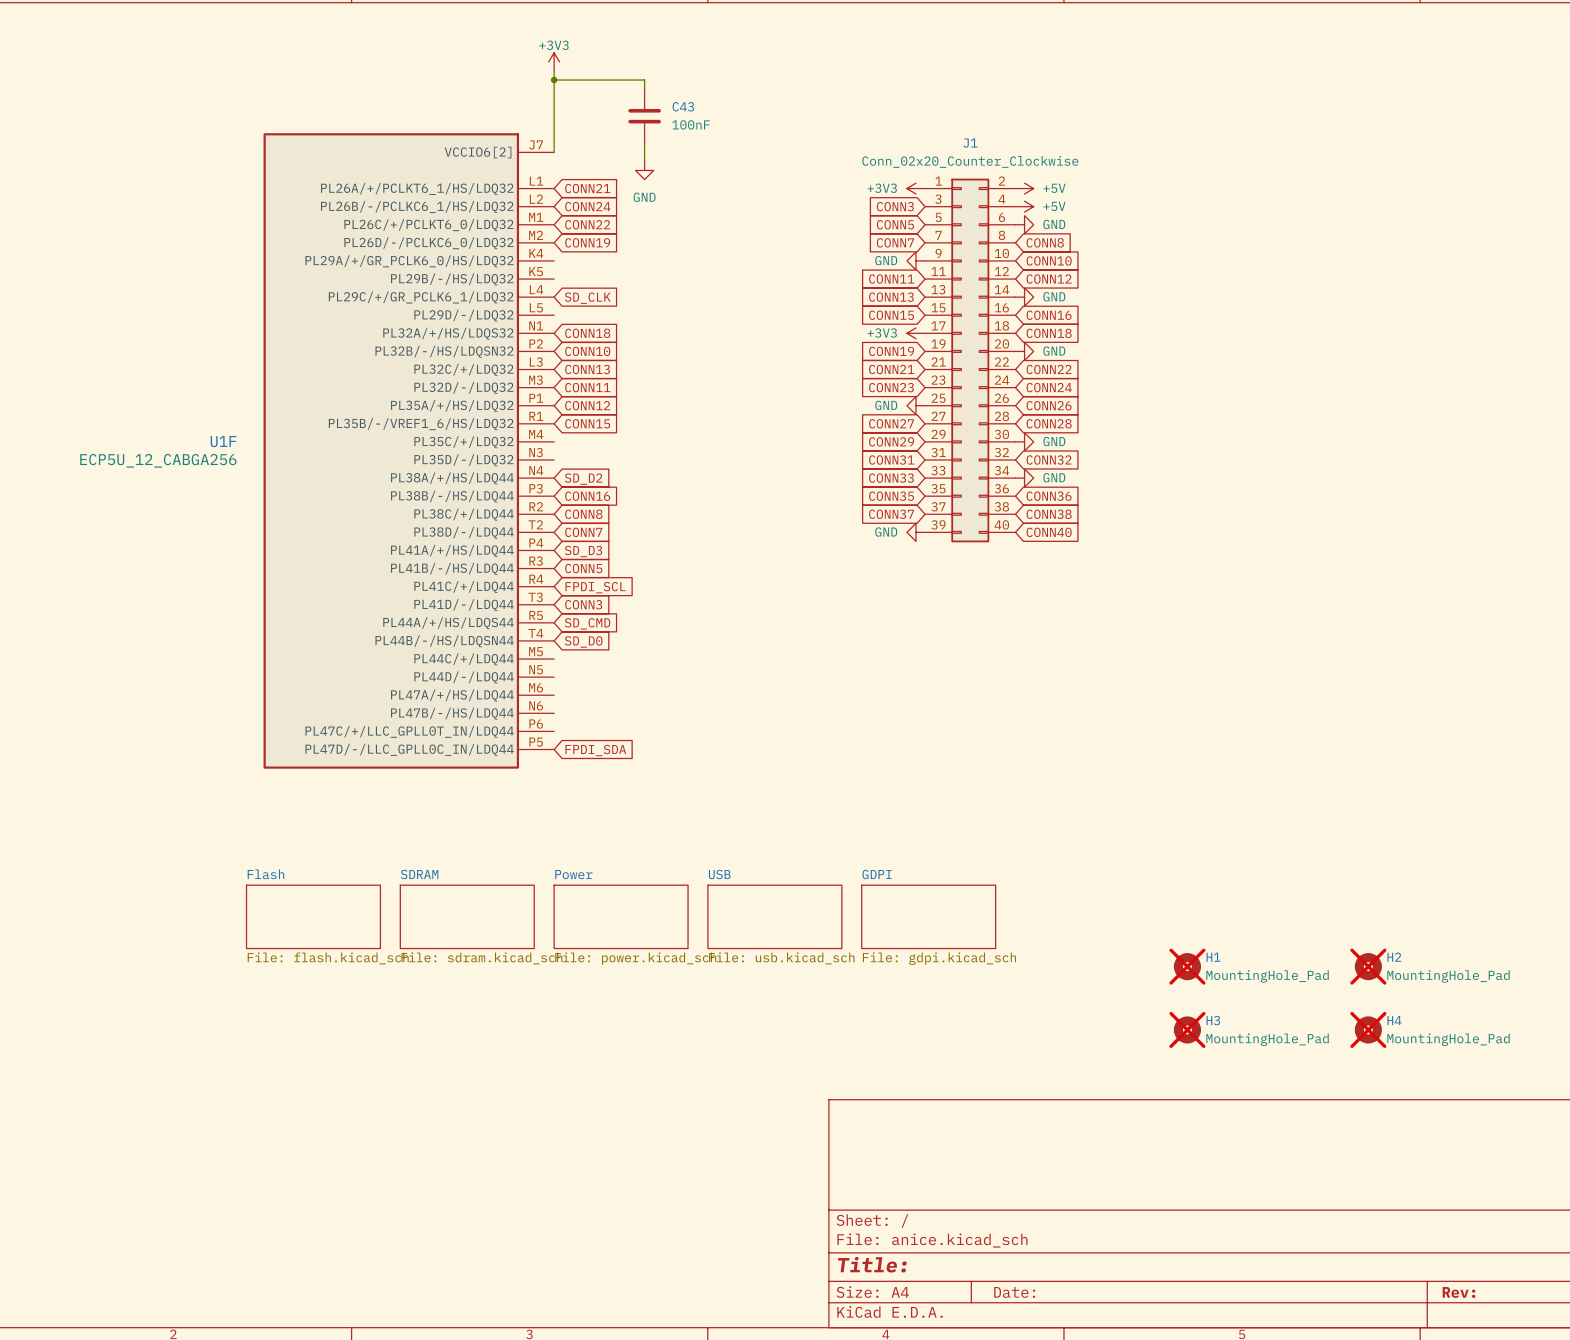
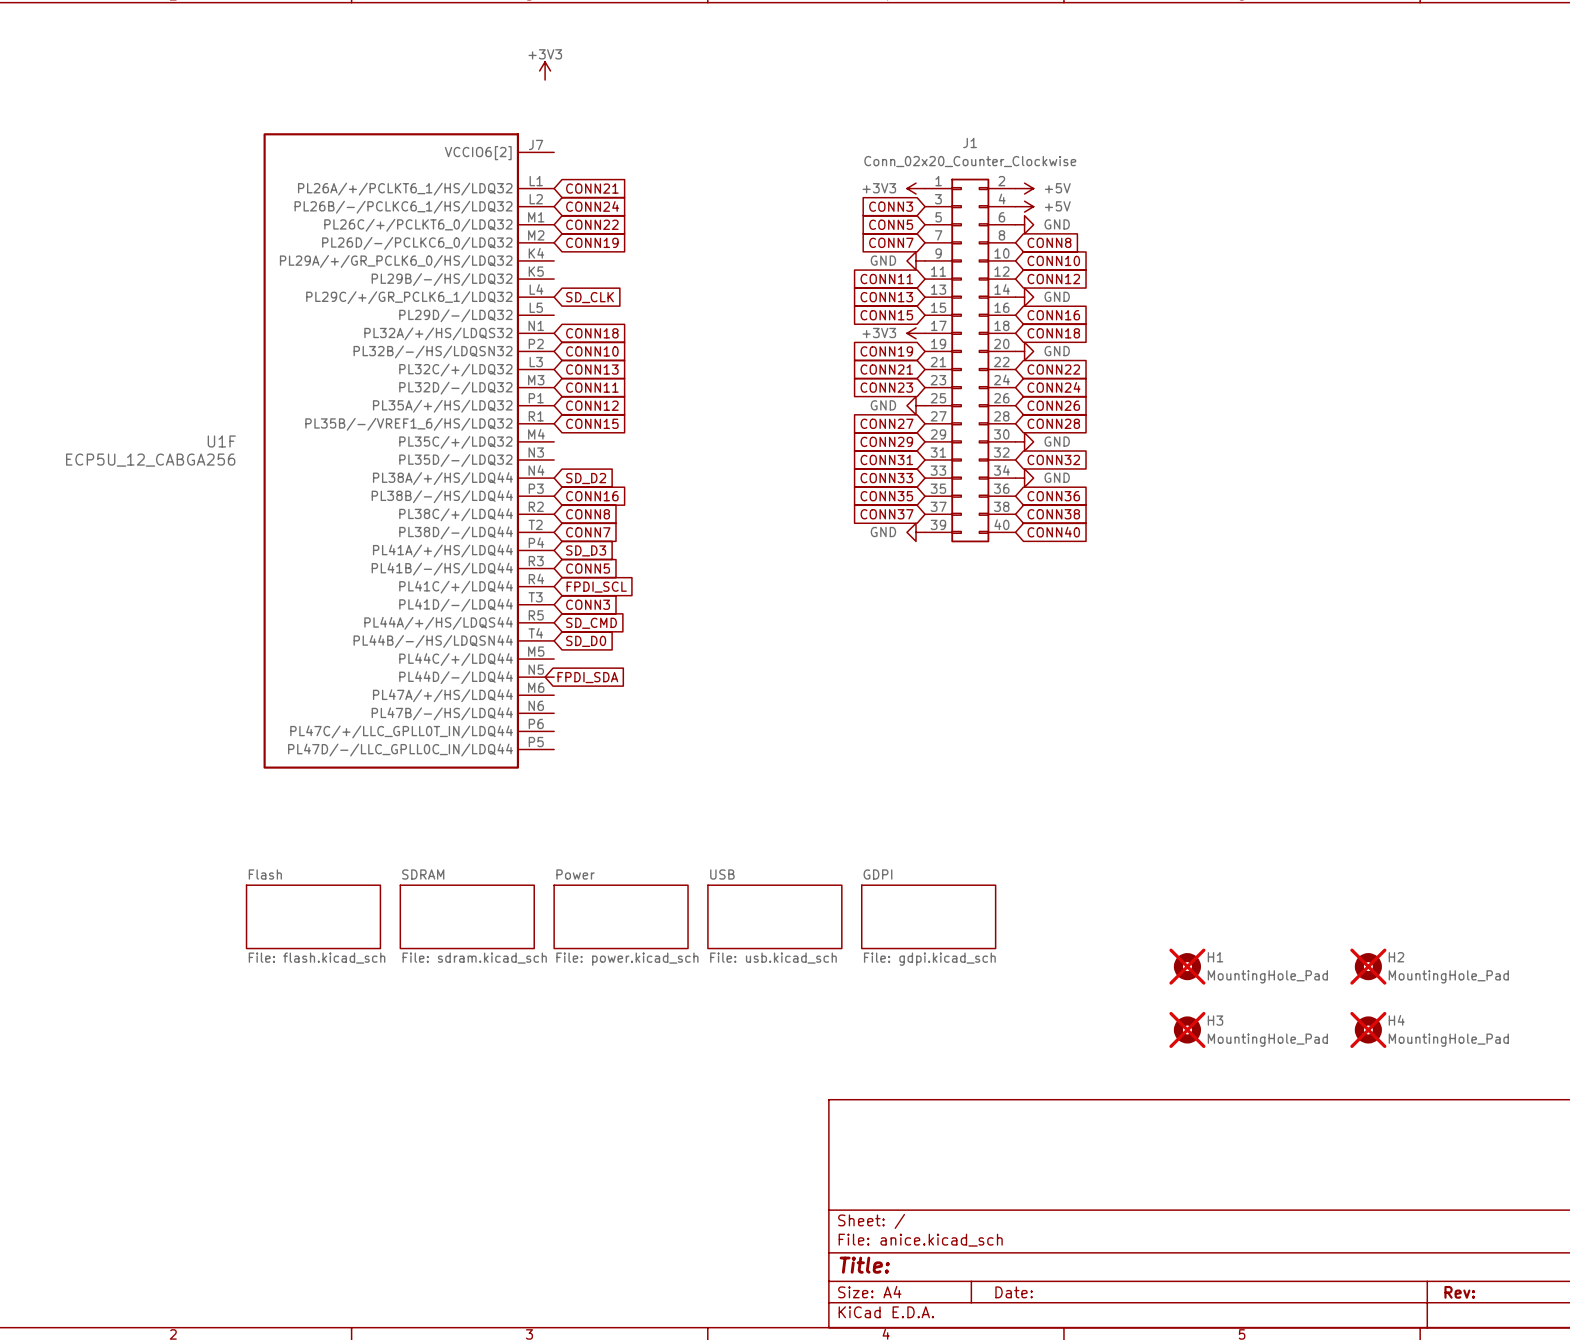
power symbol position: +3V3 (554, 61) -> +3V3 (545, 70)
wire: (554, 70) (554, 152) -> none
wire: (554, 80) (644, 80) (644, 89) -> none
junction: (554, 80) -> none
C43: 100nF (644, 116) -> none
wire: (644, 143) (644, 161) -> none
power symbol: GND (644, 170) -> none
global label position: FPDI_SDA (595, 750) -> FPDI_SDA (587, 677)

